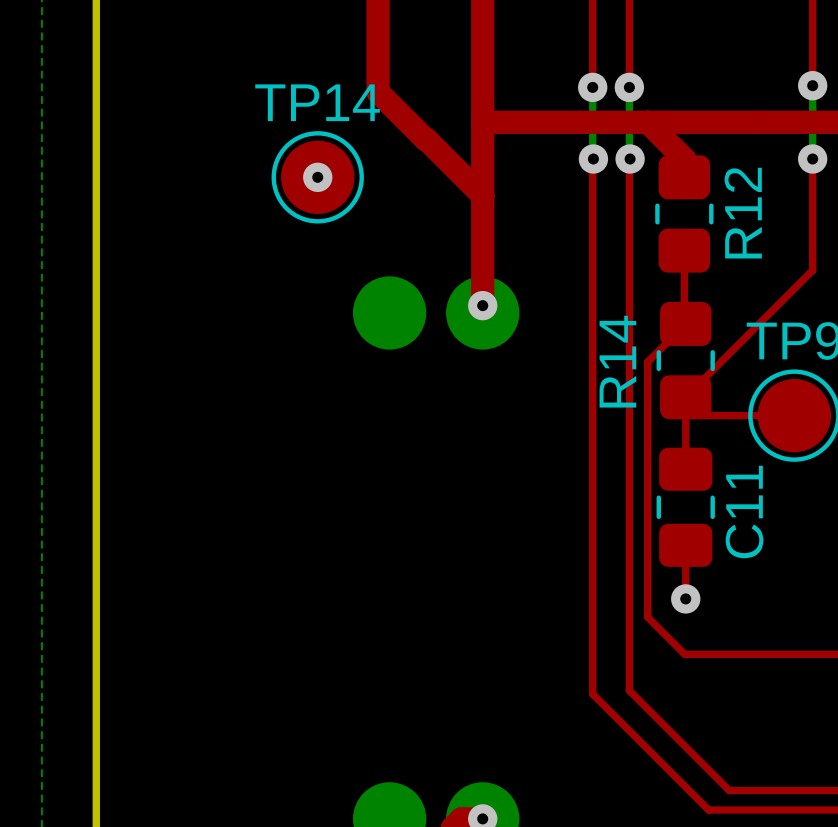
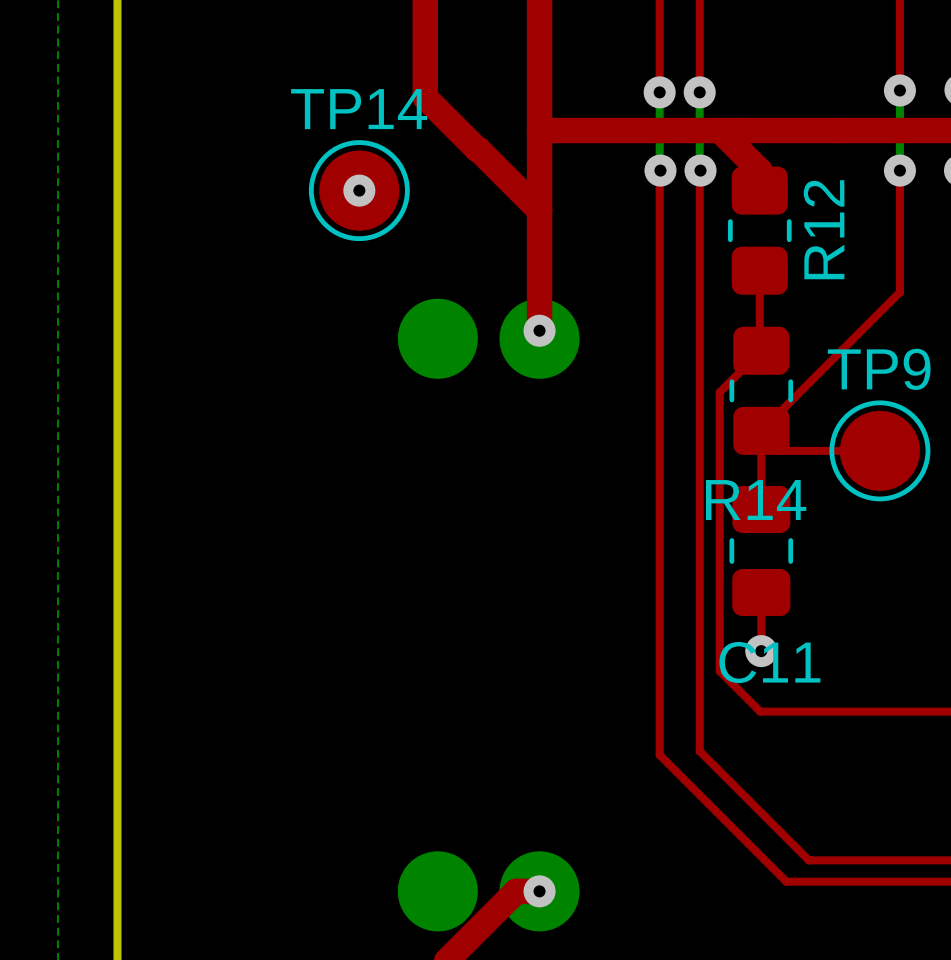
R14 name rotation: 0° (617, 361) -> 90° clockwise (756, 500)
C11 name rotation: 0° (744, 511) -> 90° clockwise (769, 662)

